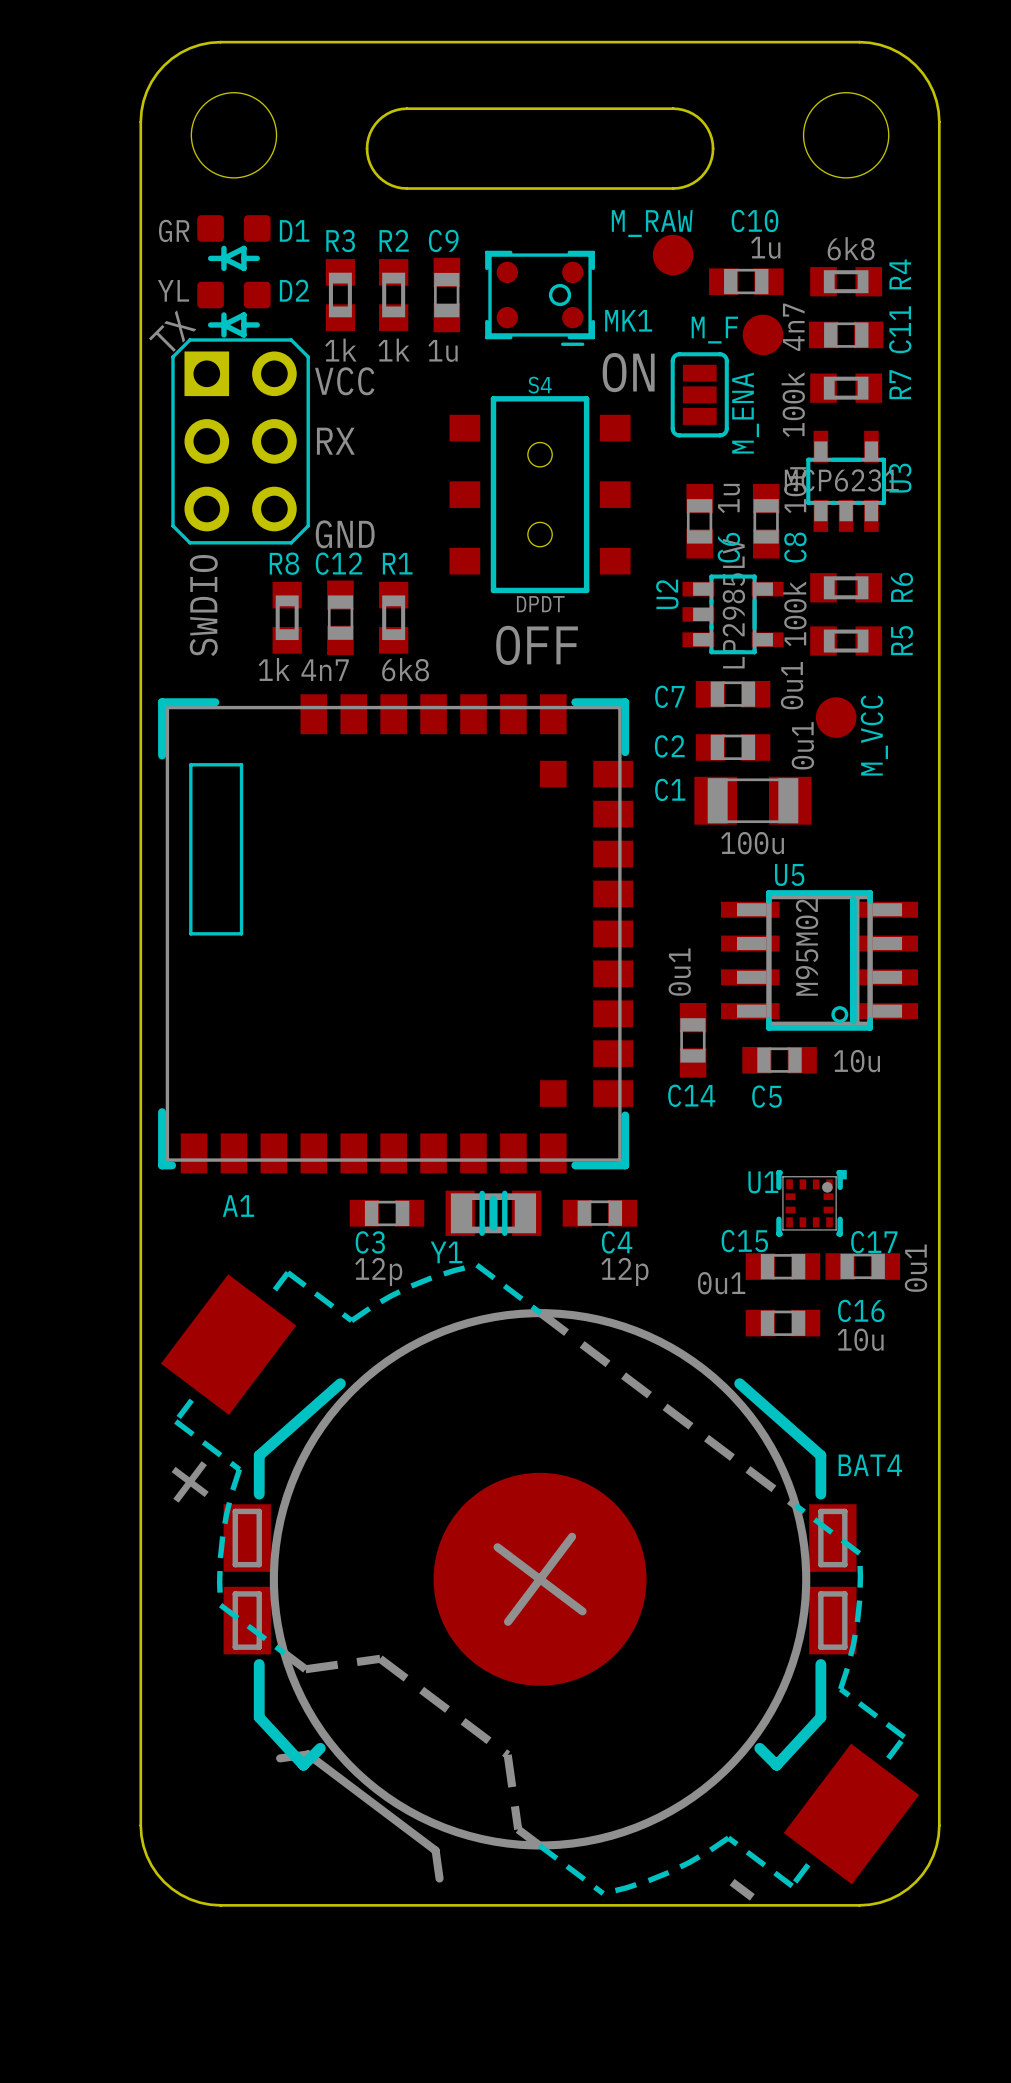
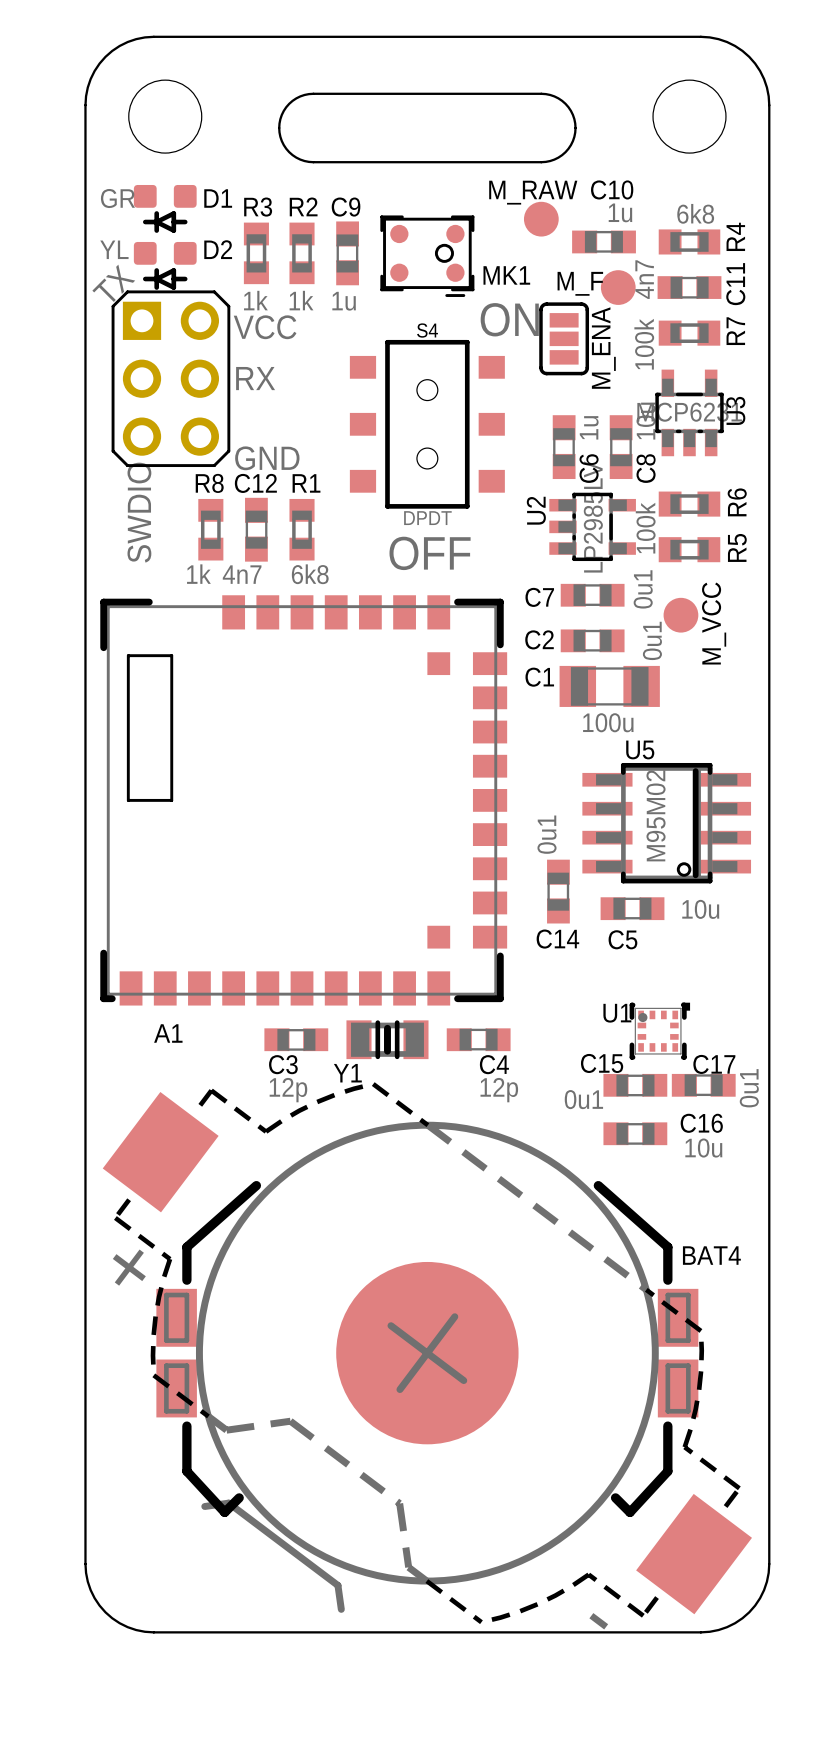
U1 footprint: [776, 1170, 847, 1237] -> [629, 1002, 691, 1060]

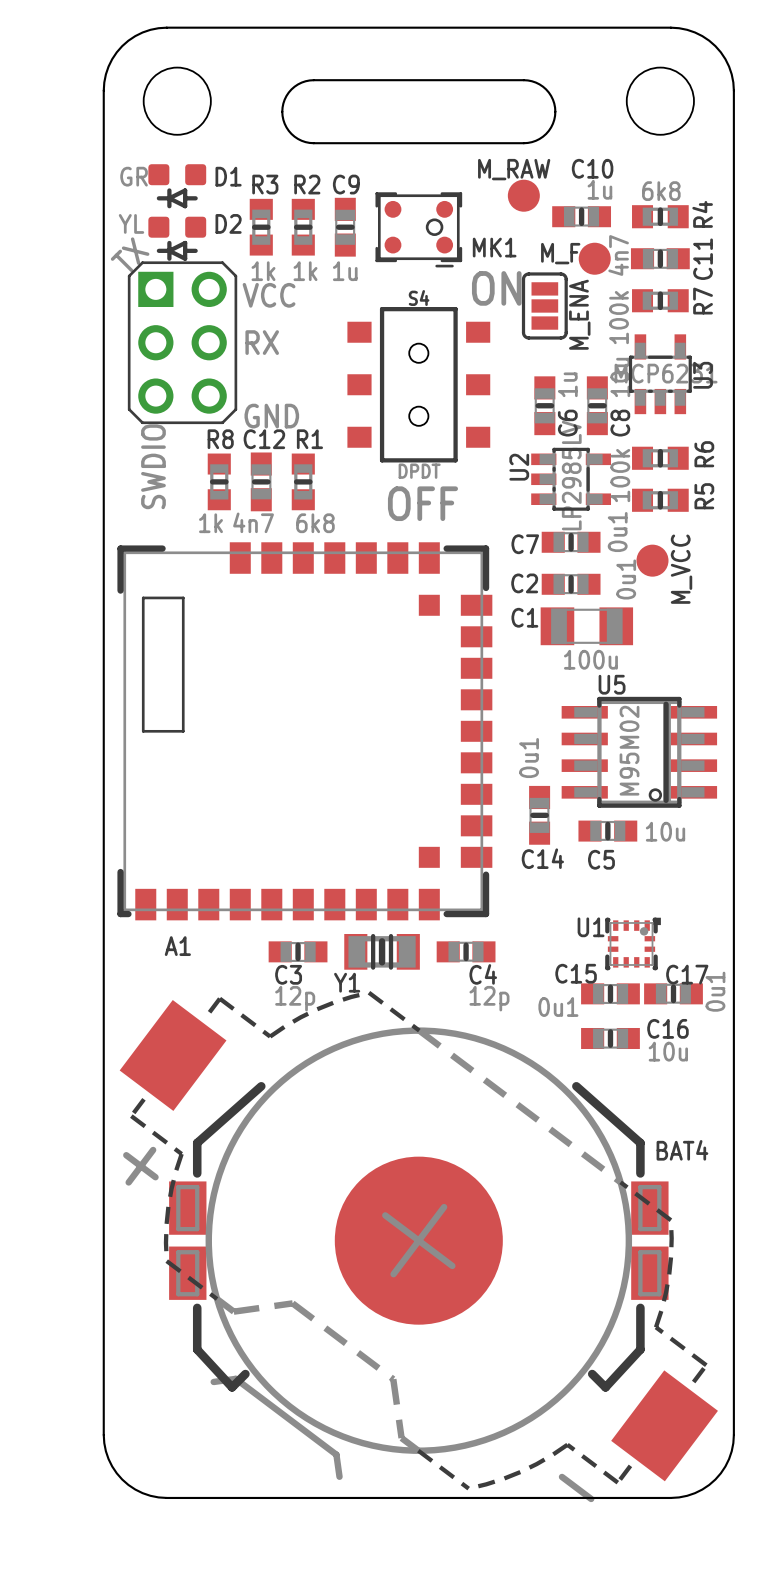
C9 footprint: [336, 221, 359, 286] -> [334, 197, 356, 257]
R3 footprint: [243, 222, 269, 285] -> [249, 198, 273, 256]
R2 footprint: [289, 222, 315, 285] -> [291, 198, 315, 256]
R4 footprint: [658, 229, 721, 255] -> [632, 205, 689, 229]
C10 footprint: [572, 230, 636, 254] -> [552, 206, 612, 228]
C11 footprint: [657, 276, 722, 299] -> [630, 248, 690, 270]
R7 footprint: [658, 320, 721, 346] -> [632, 289, 689, 313]
C6 footprint: [552, 415, 576, 480] -> [534, 376, 556, 436]
C8 footprint: [609, 415, 633, 480] -> [586, 376, 608, 436]
R6 footprint: [658, 491, 721, 517] -> [632, 446, 689, 470]
C12 footprint: [245, 497, 268, 562] -> [250, 452, 272, 512]
R8 footprint: [198, 498, 224, 561] -> [207, 453, 231, 511]
R1 footprint: [289, 498, 315, 561] -> [291, 453, 315, 511]
R5 footprint: [658, 537, 721, 563] -> [632, 488, 689, 512]
C7 footprint: [560, 583, 625, 607] -> [541, 531, 601, 553]
C2 footprint: [560, 629, 625, 653] -> [541, 573, 601, 595]
C14 footprint: [547, 859, 570, 924] -> [529, 785, 551, 845]
C5 footprint: [600, 897, 665, 921] -> [578, 820, 638, 842]
U1 footprint: [629, 1002, 691, 1060] -> [605, 917, 661, 971]
C3 footprint: [264, 1028, 329, 1052] -> [268, 941, 328, 963]
C4 footprint: [446, 1028, 511, 1052] -> [436, 941, 496, 963]
C15 footprint: [603, 1073, 668, 1097] -> [581, 983, 640, 1005]
C17 footprint: [671, 1073, 736, 1097] -> [644, 983, 703, 1005]
C16 footprint: [603, 1122, 668, 1146] -> [581, 1027, 640, 1050]

